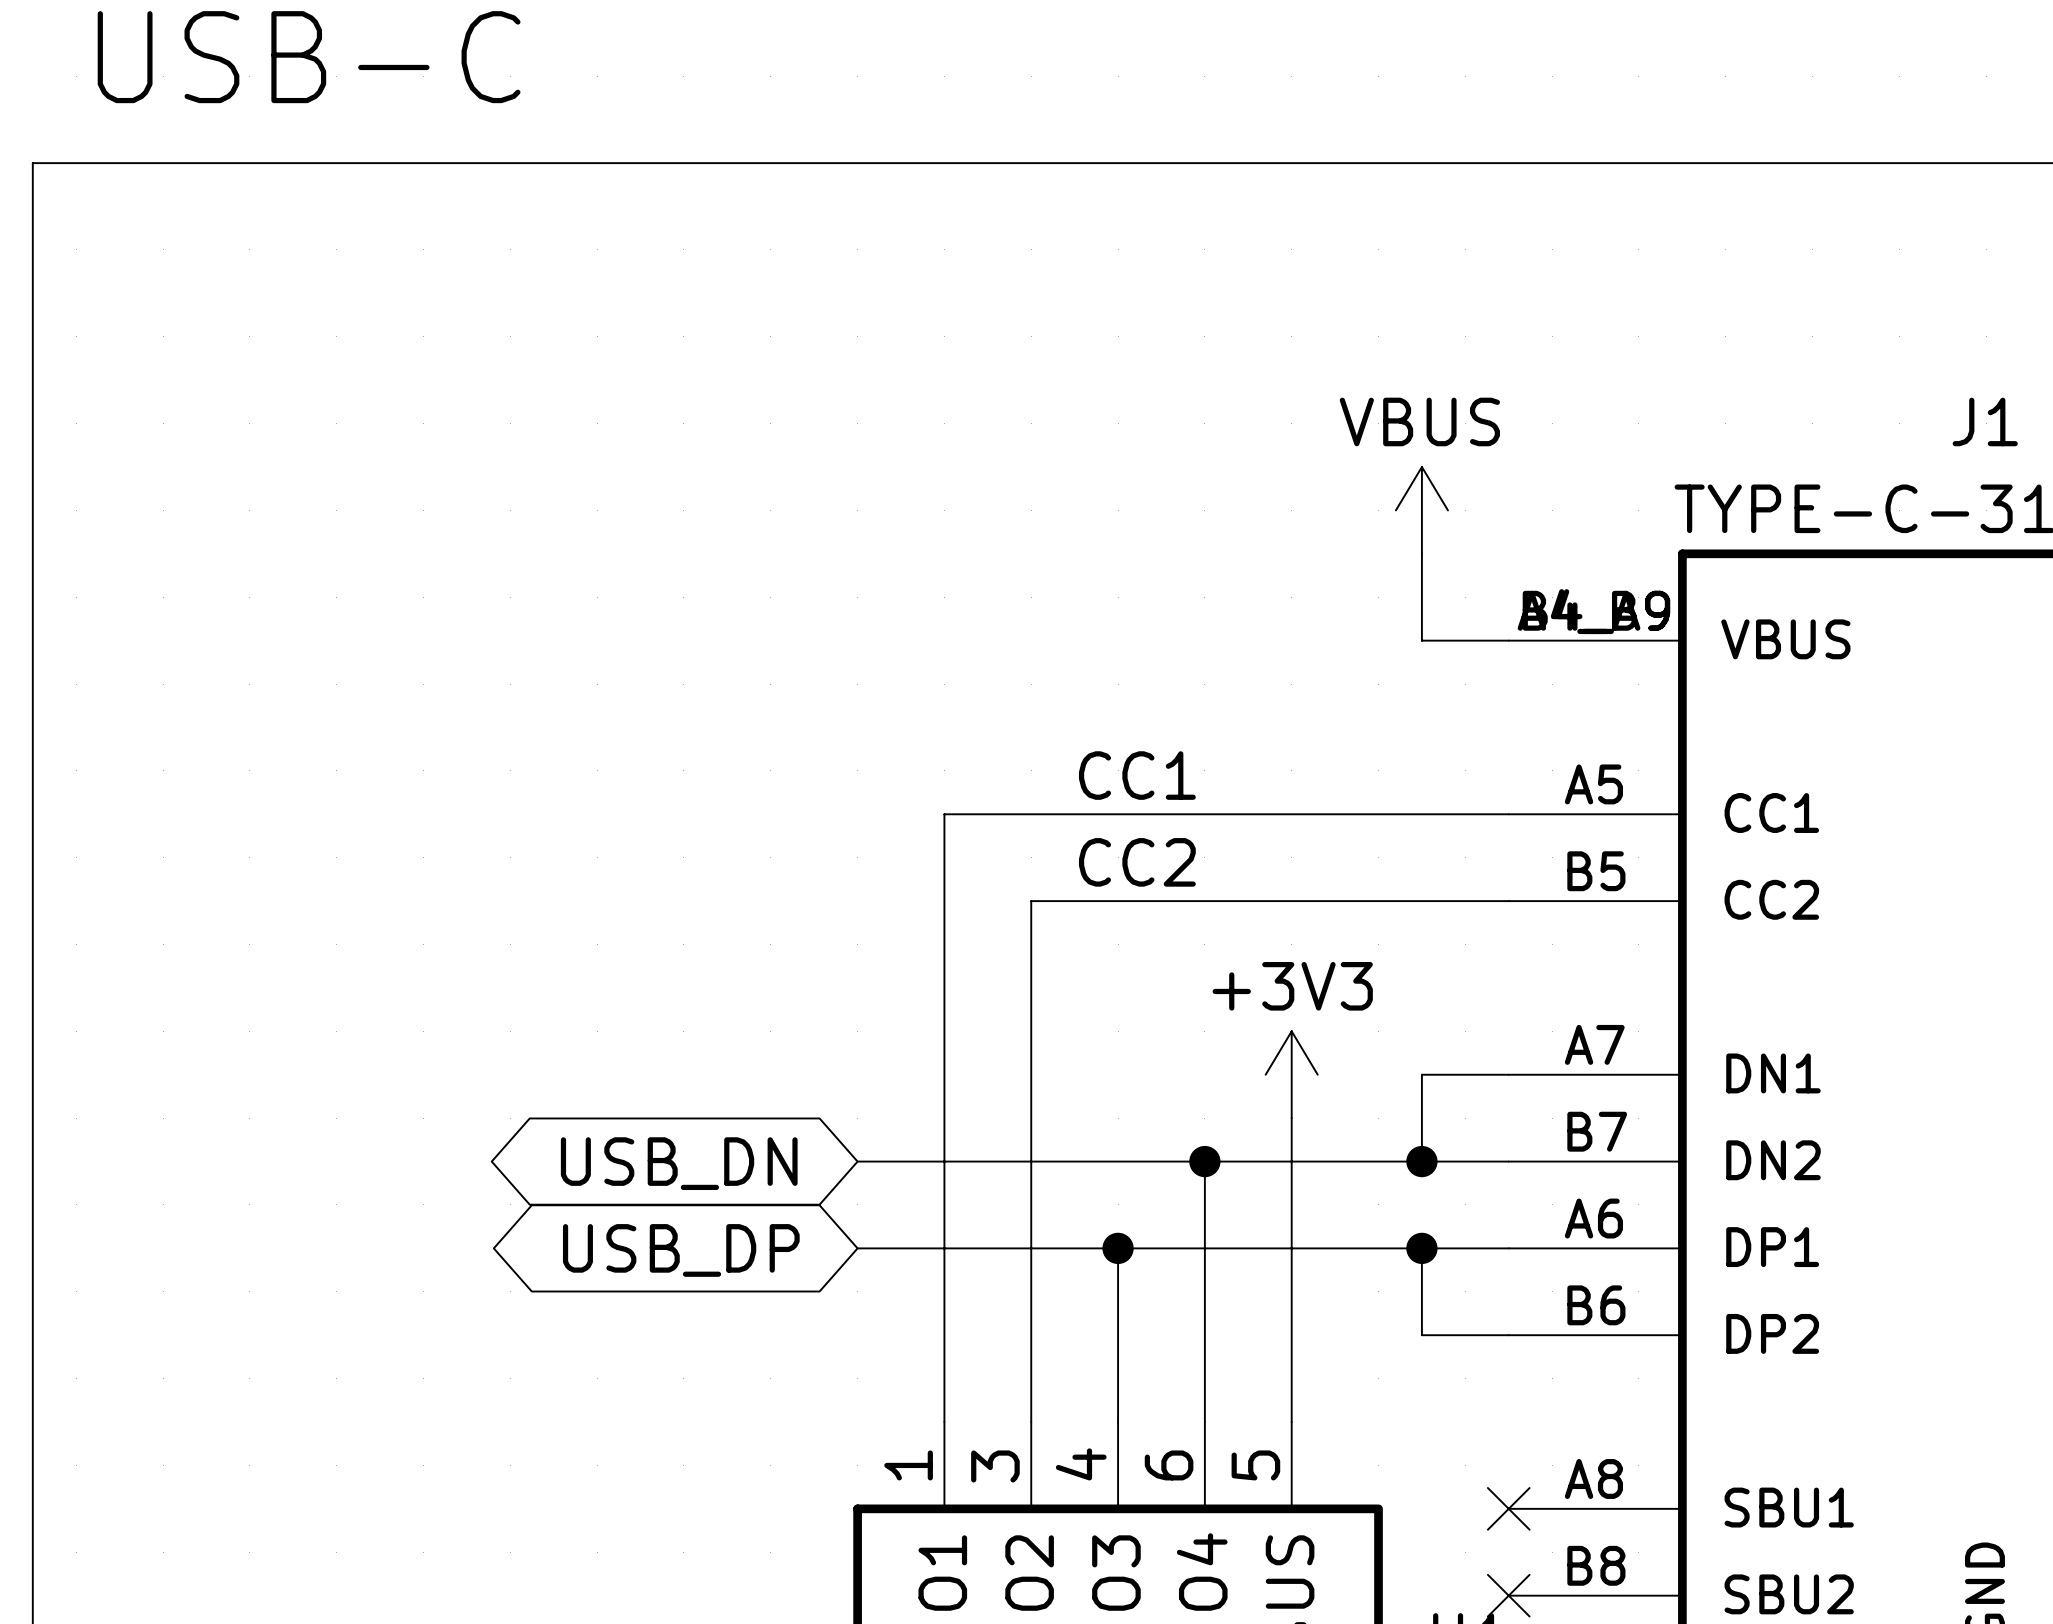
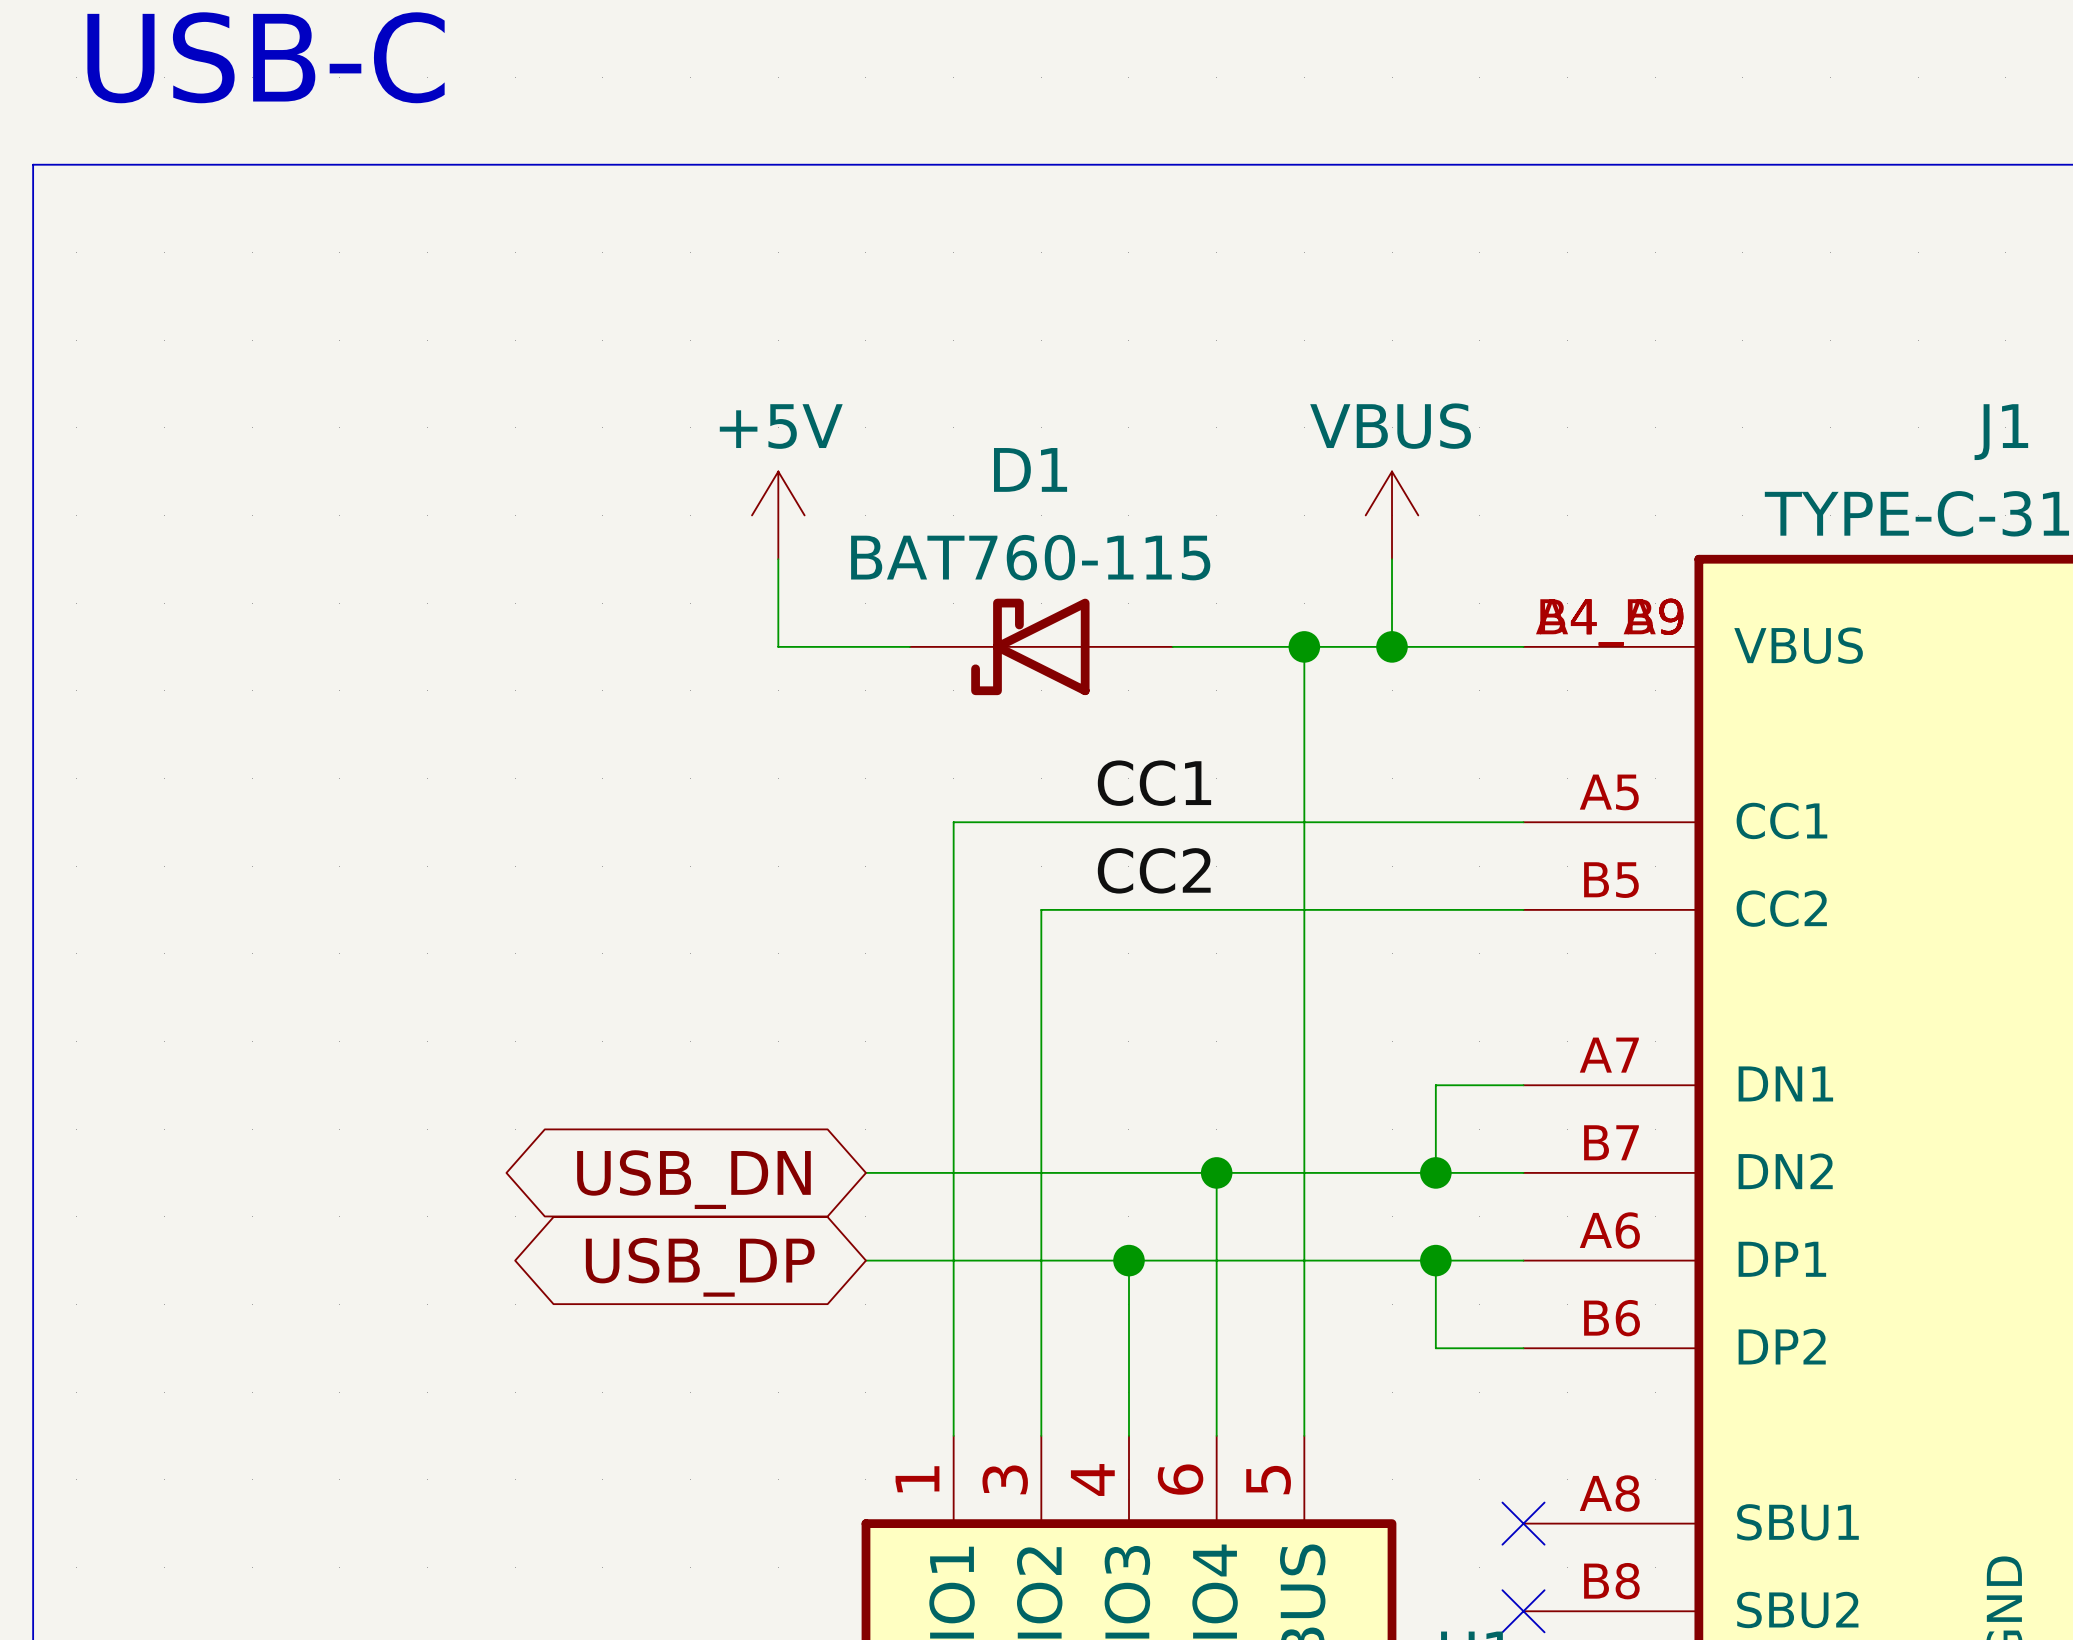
power symbol: none -> +5V (778, 515)
power symbol position: VBUS (1421, 510) -> VBUS (1392, 515)
wire: none -> (778, 559) (778, 646) (909, 646)
wire: none -> (1392, 559) (1392, 646)
wire: (1421, 553) (1421, 640) -> (1172, 646) (1435, 646)
D1: none -> BAT760-115 (1041, 646)
wire: none -> (1304, 646) (1304, 1129)
junction: none -> (1304, 646)
junction: none -> (1392, 646)
power symbol: +3V3 (1291, 1074) -> none

